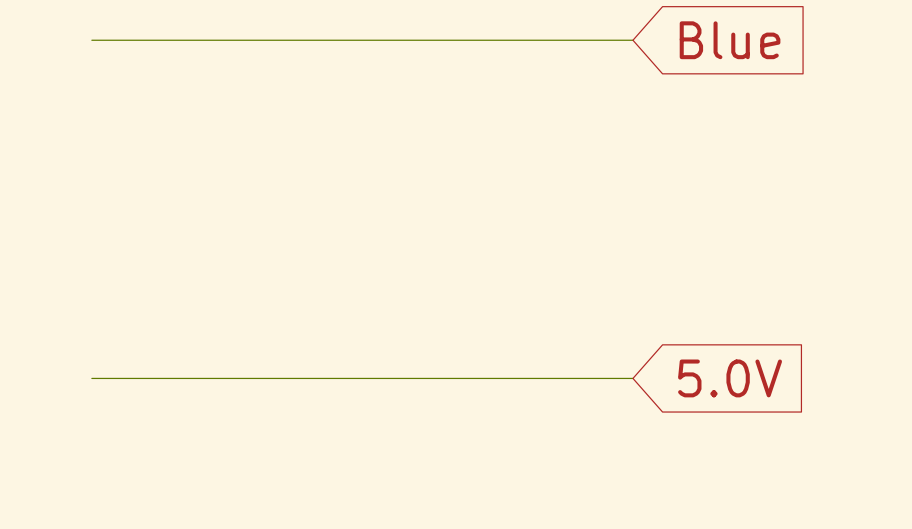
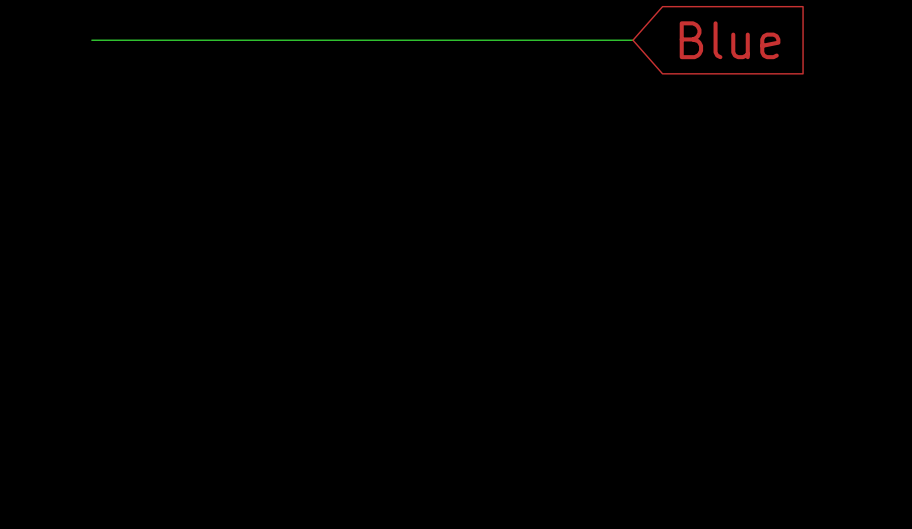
wire: (91, 378) (632, 378) -> none
global label: 5.0V (730, 378) -> none

